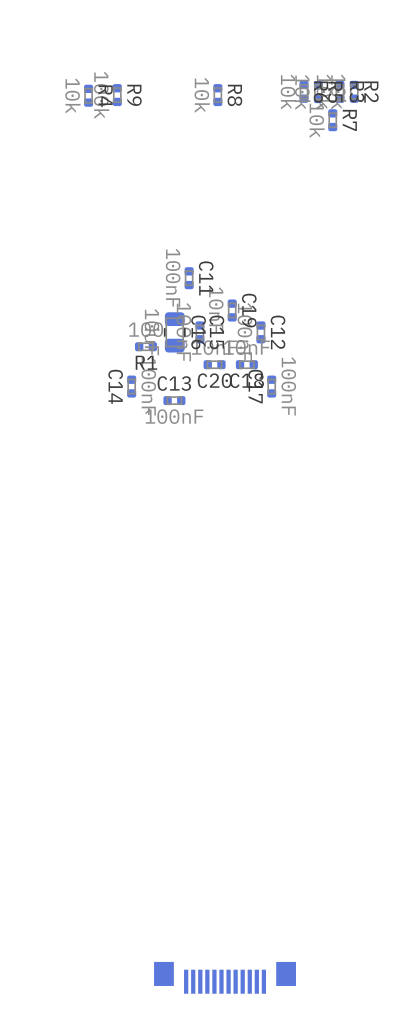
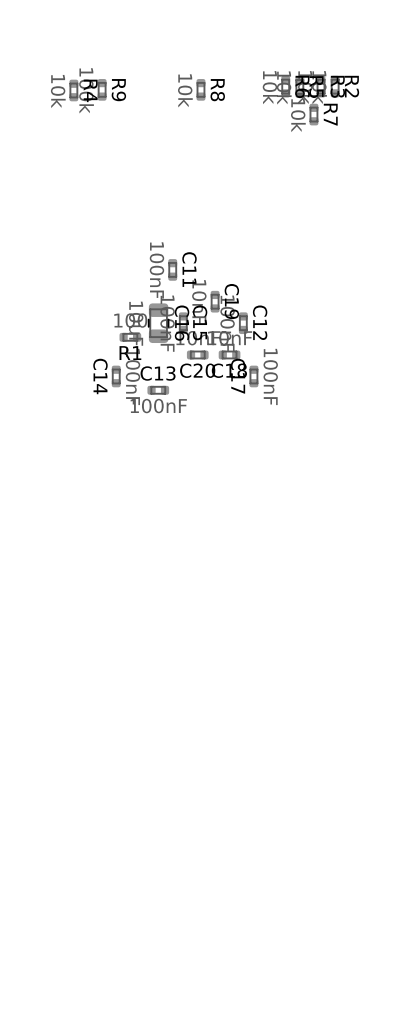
part: (225, 977) -> none

